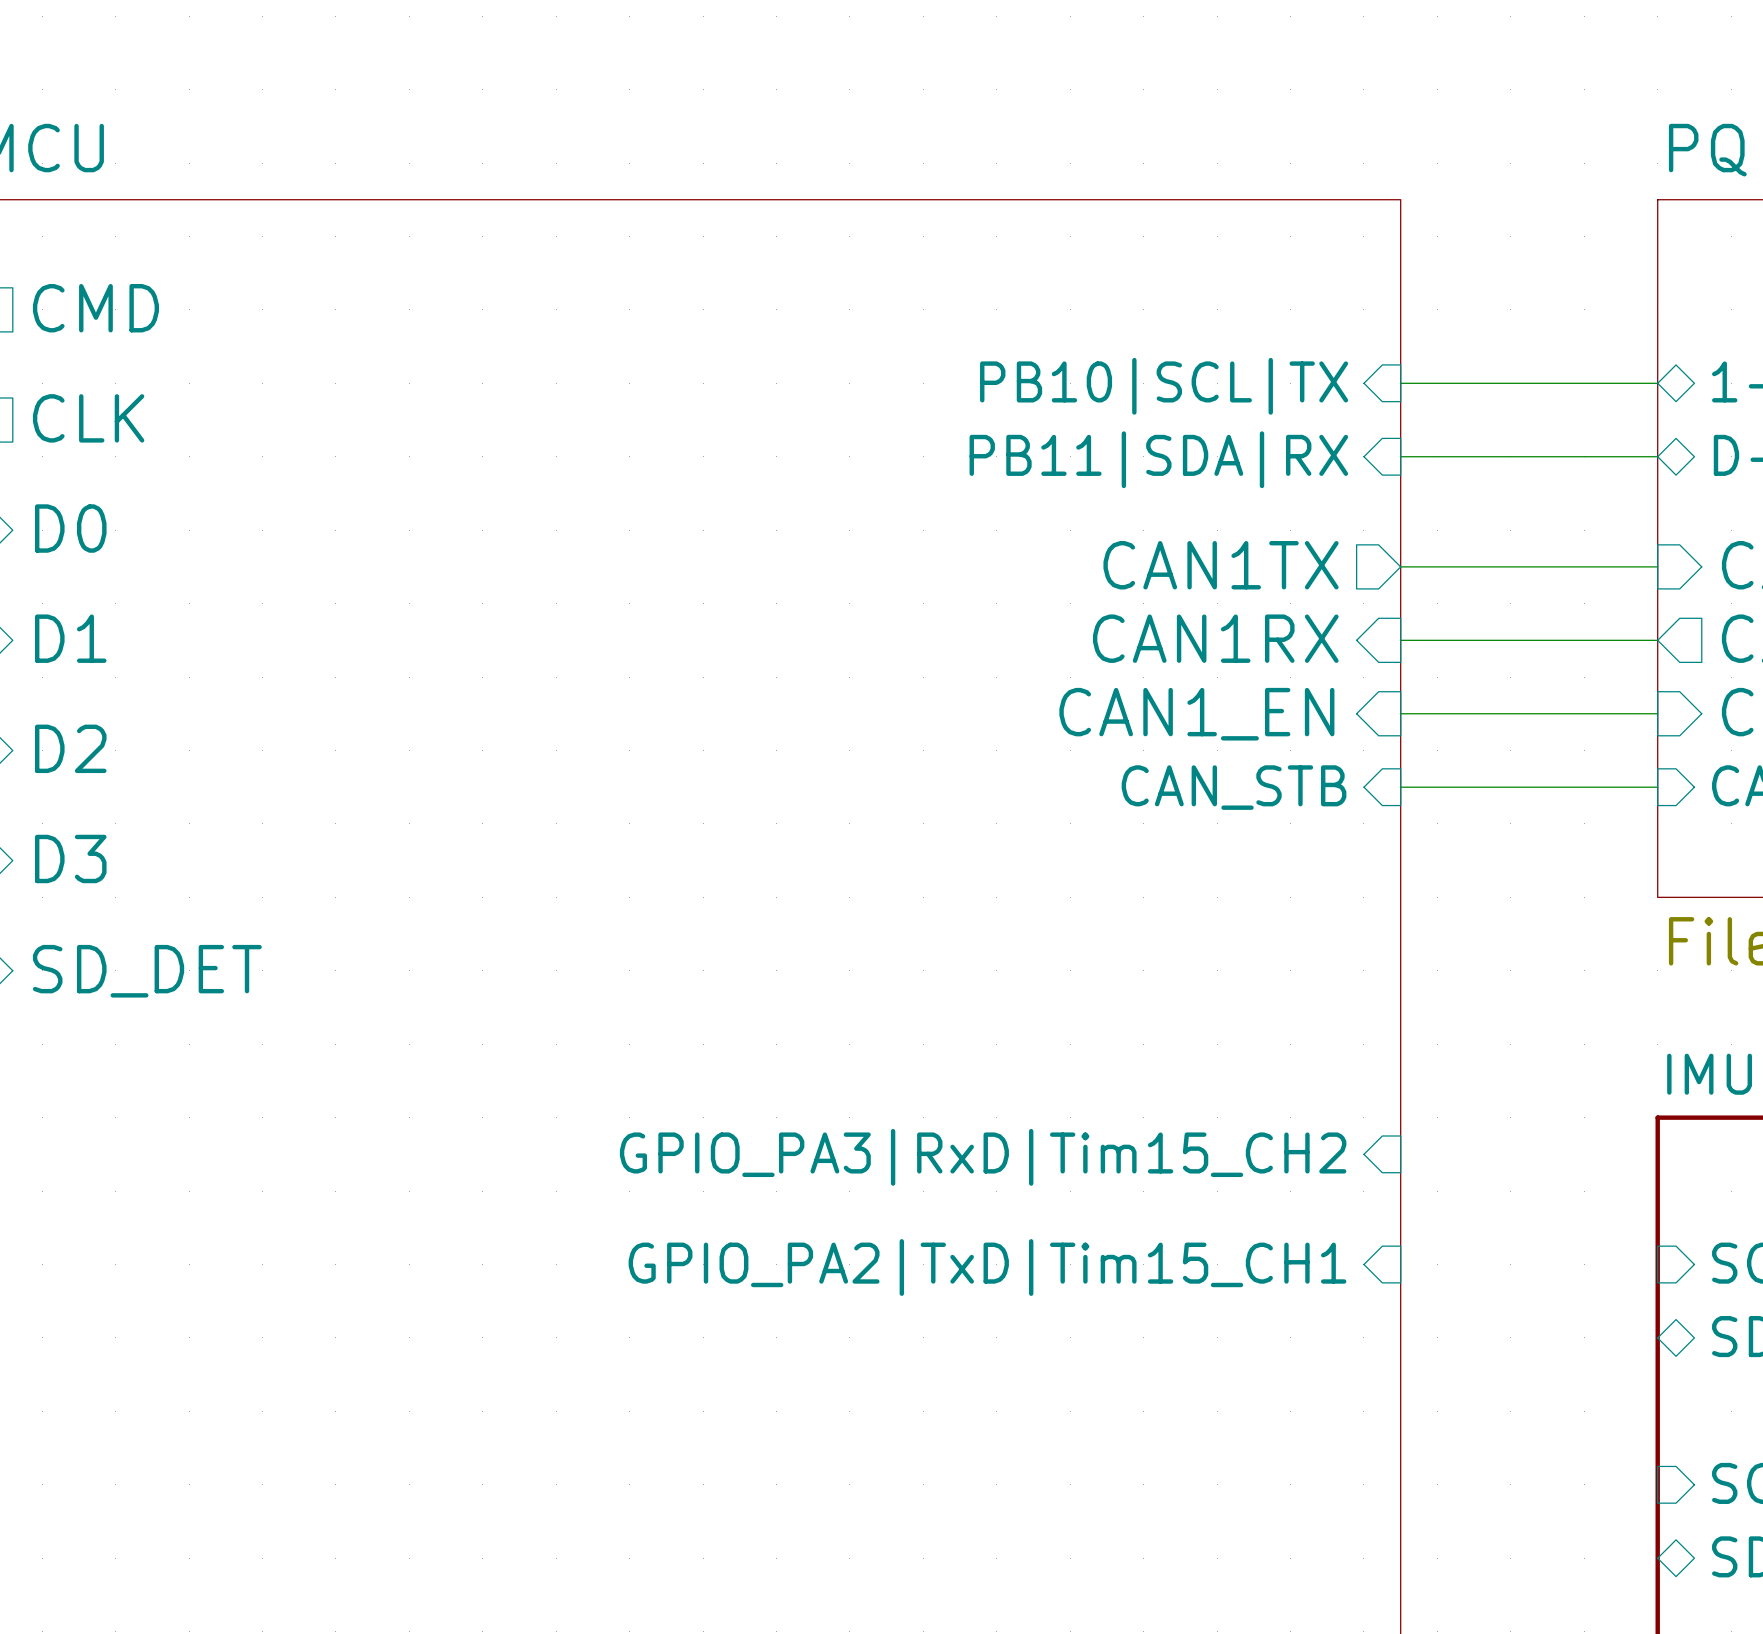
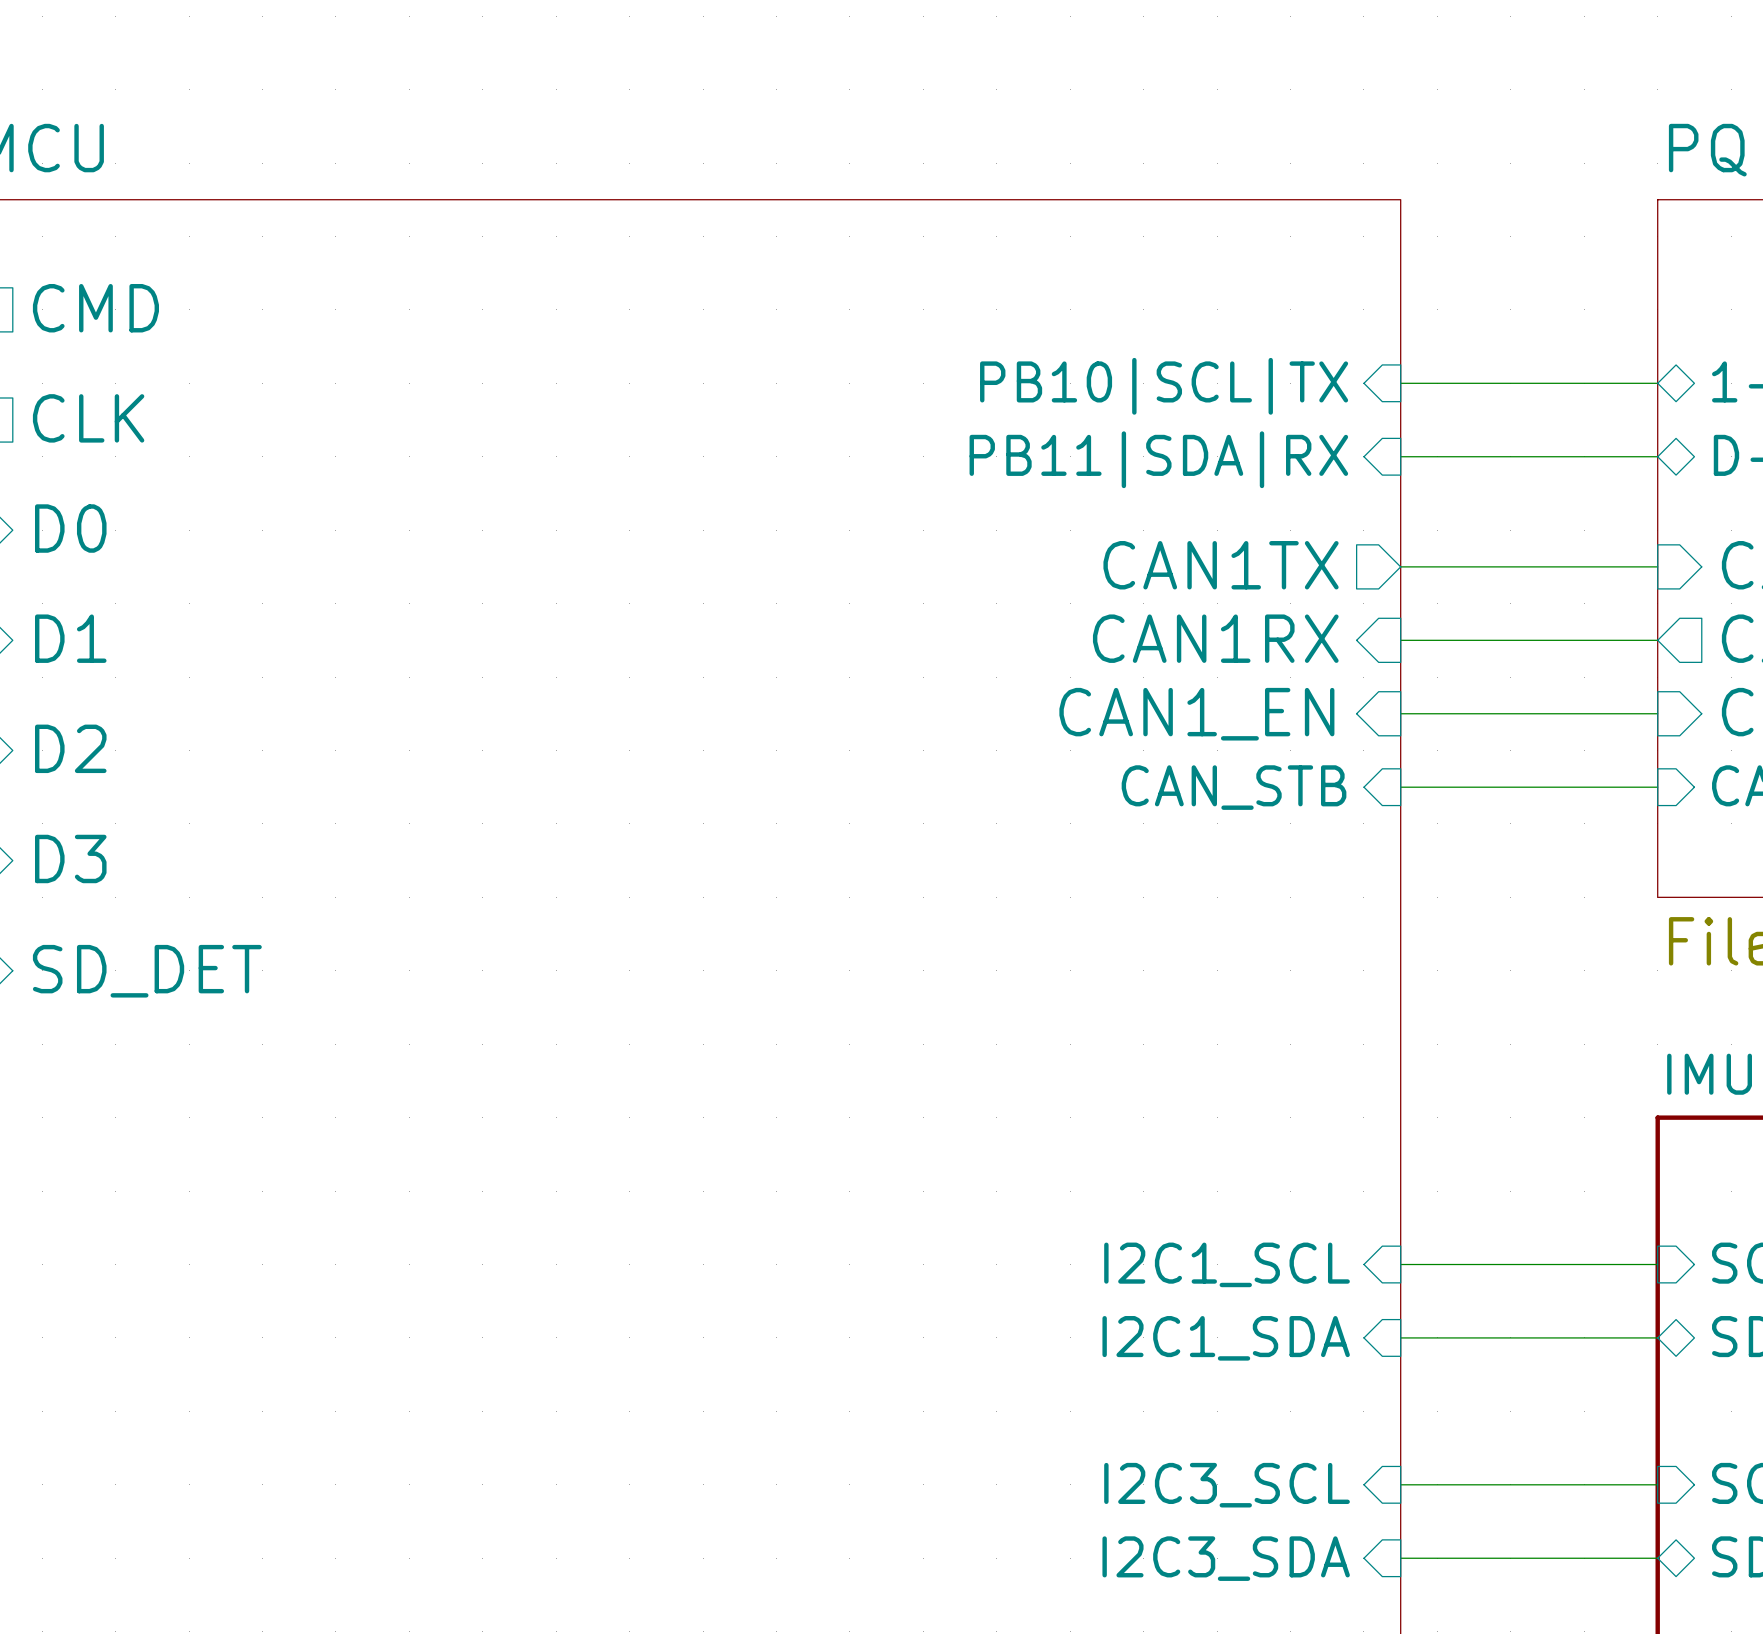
sheet pin: GPIO_PA3|RxD|Tim15_CH2 (983, 1157) -> none
wire: none -> (1400, 1264) (1657, 1264)
sheet pin: GPIO_PA2|TxD|Tim15_CH1 (987, 1267) -> I2C1_SCL (1227, 1264)
wire: none -> (1400, 1337) (1657, 1337)
sheet pin: none -> I2C1_SDA (1226, 1338)
wire: none -> (1400, 1484) (1657, 1484)
sheet pin: none -> I2C3_SCL (1227, 1485)
sheet pin: none -> I2C3_SDA (1226, 1558)
wire: none -> (1400, 1558) (1657, 1558)

